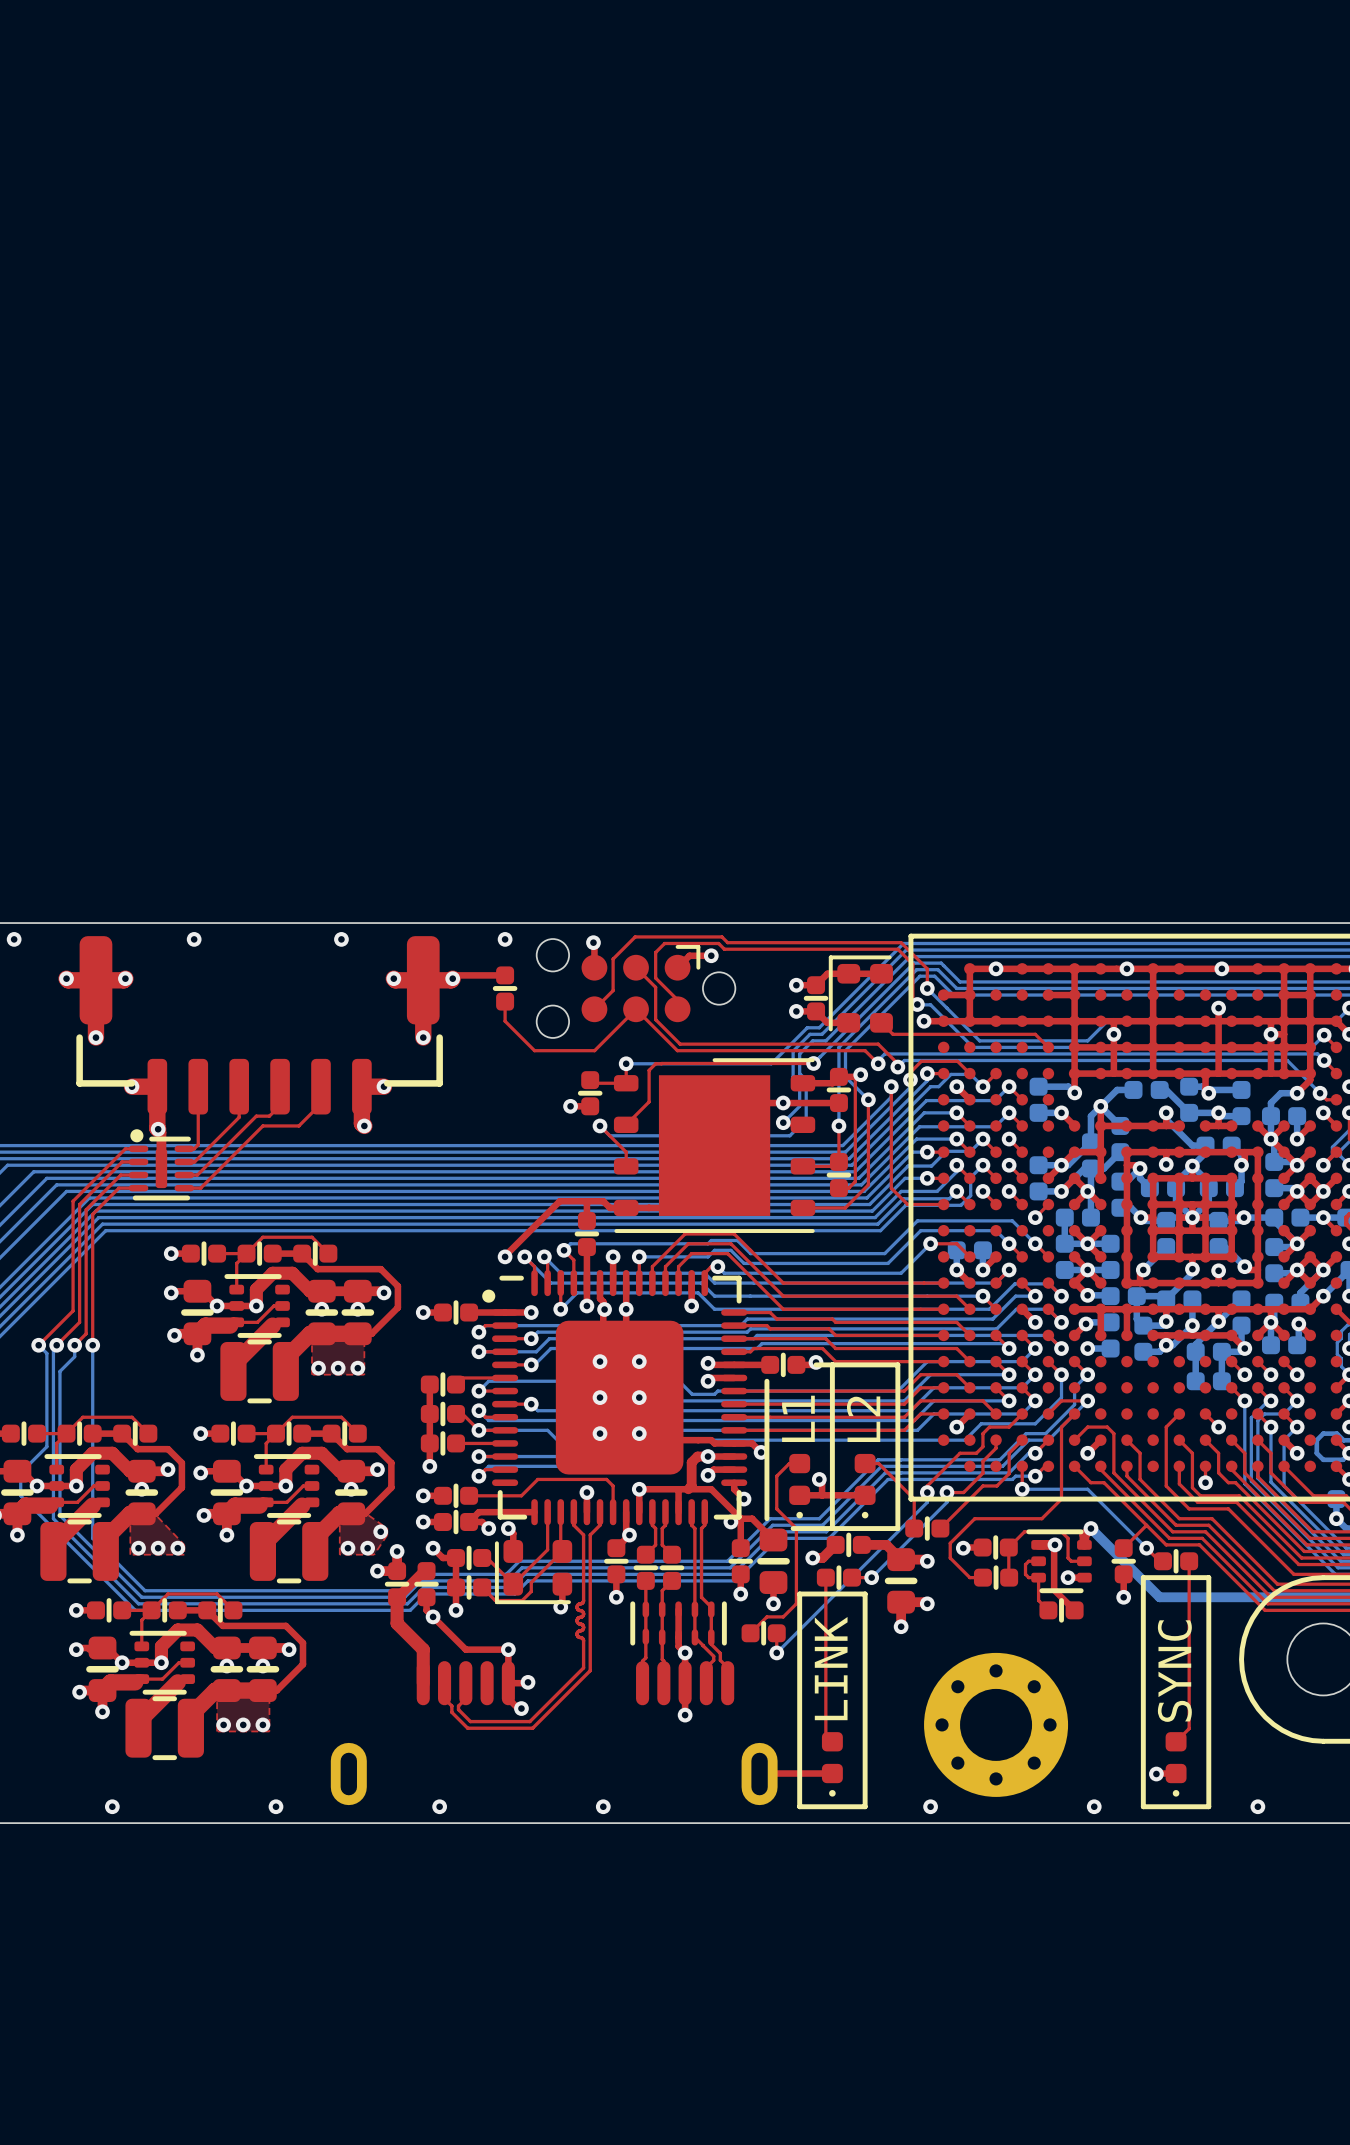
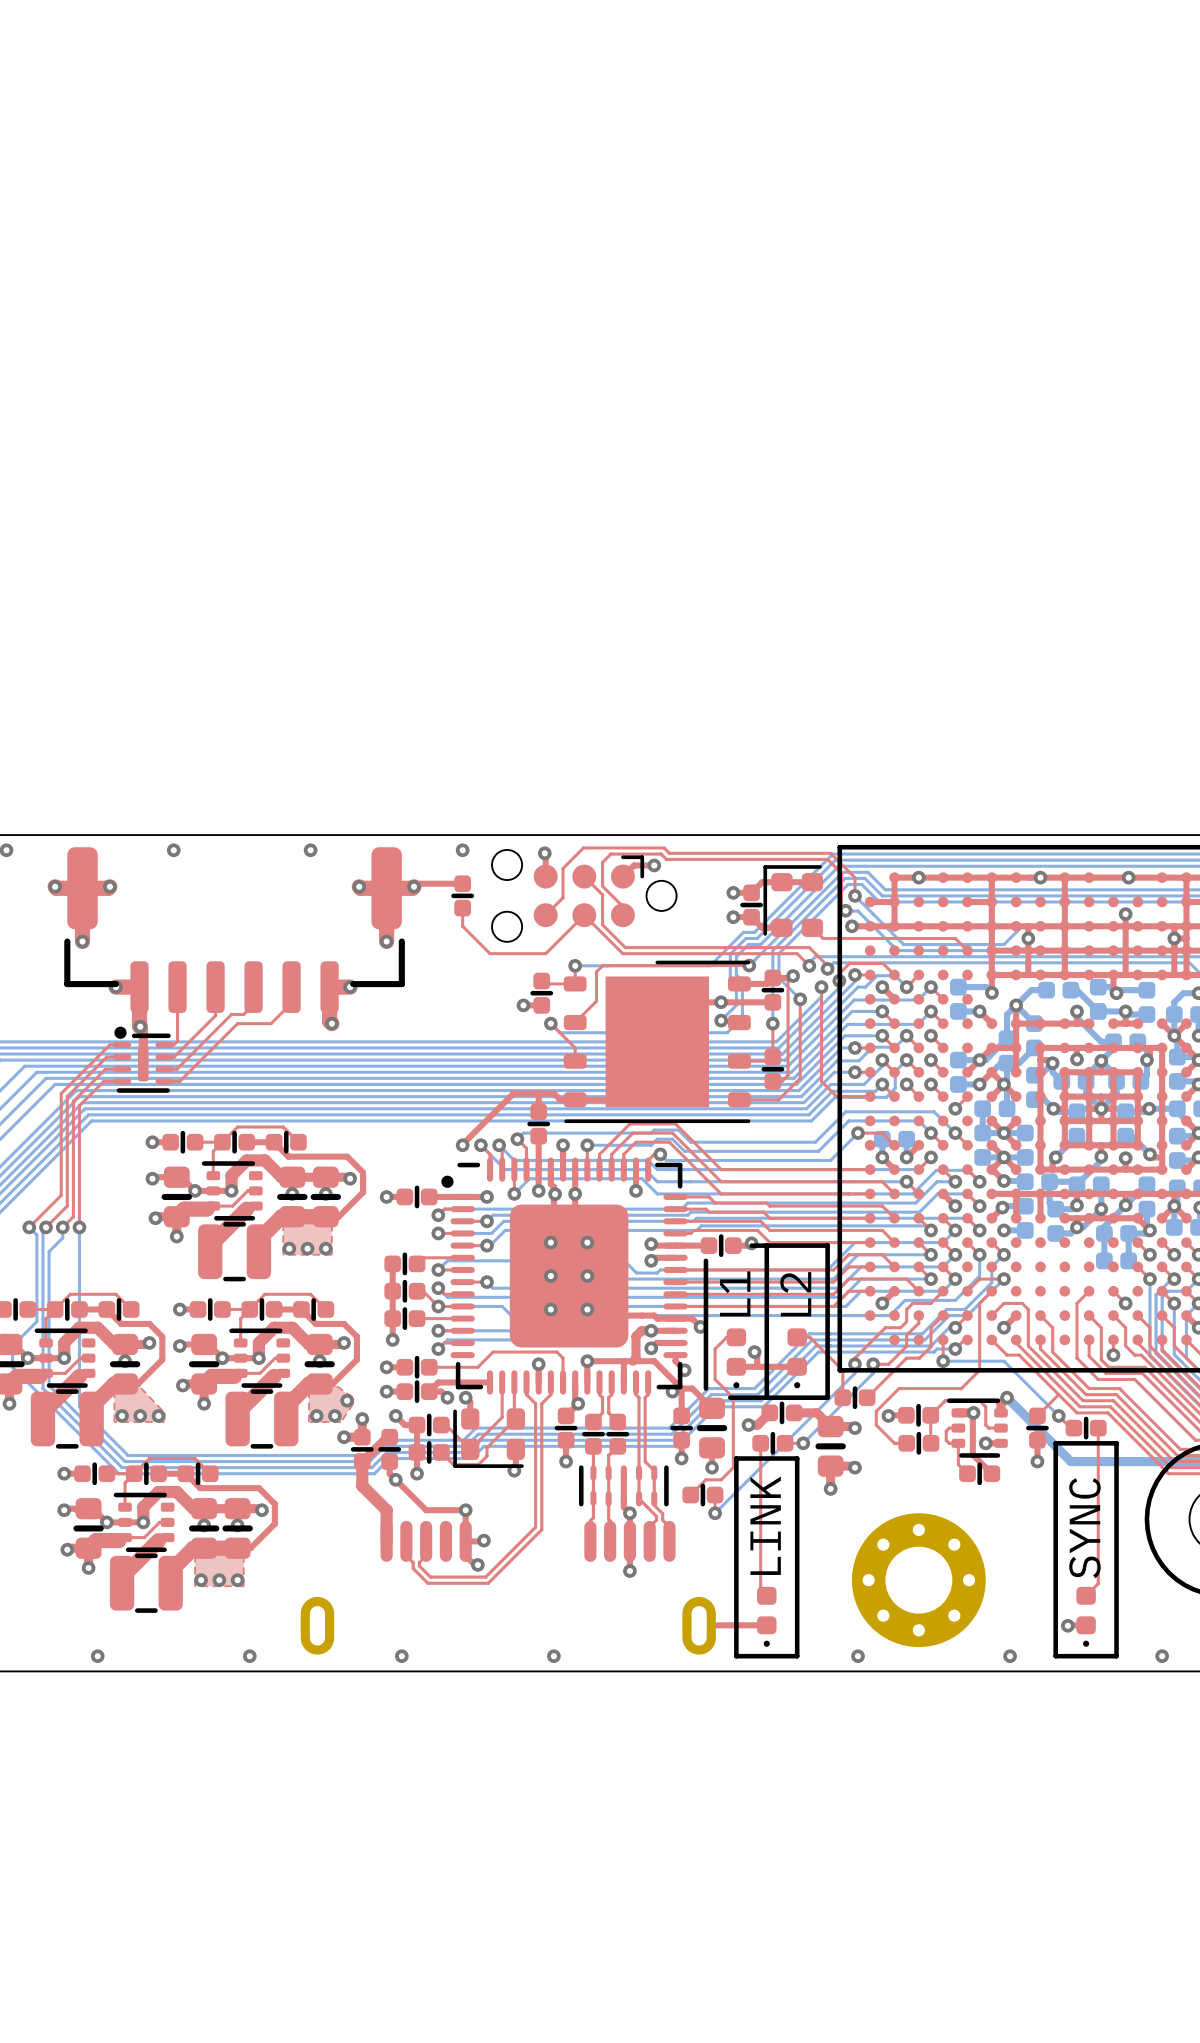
top track: (583, 1600) (577, 1607) -> (535, 1464) (535, 1502)
top track: (577, 1607) (583, 1613) (577, 1620) -> none
top track: (577, 1620) (583, 1627) -> none
top track: (583, 1627) (577, 1634) -> none
top track: (577, 1634) (583, 1640) -> none

